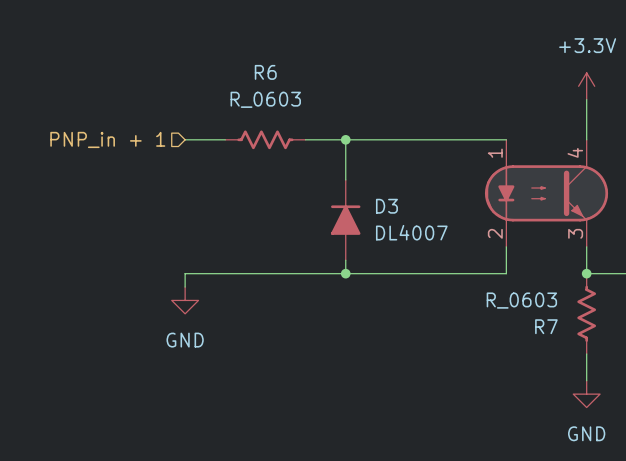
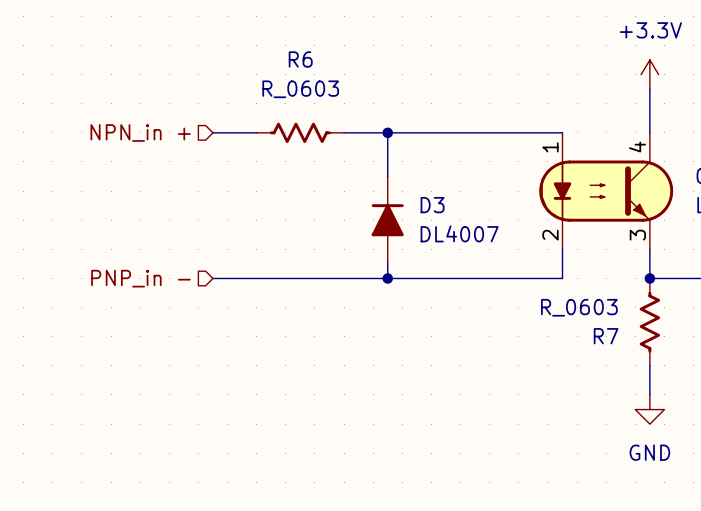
hierarchical label: PNP_in + 1 (107, 139) -> NPN_in + (140, 132)
hierarchical label: none -> PNP_in - (140, 278)
wire: (185, 273) (185, 287) -> none
power symbol: GND (185, 300) -> none

